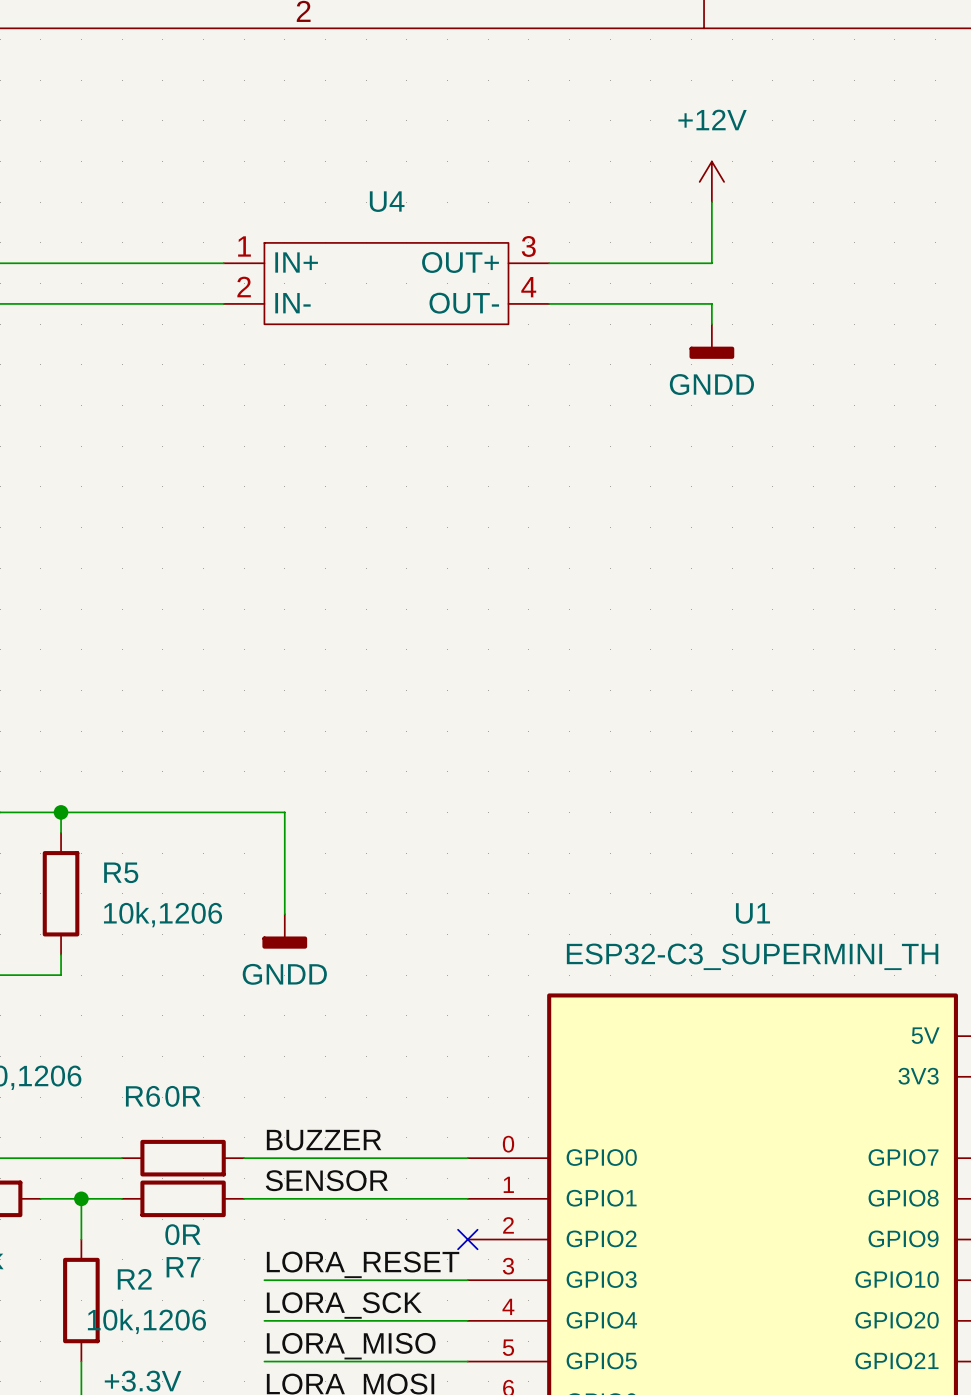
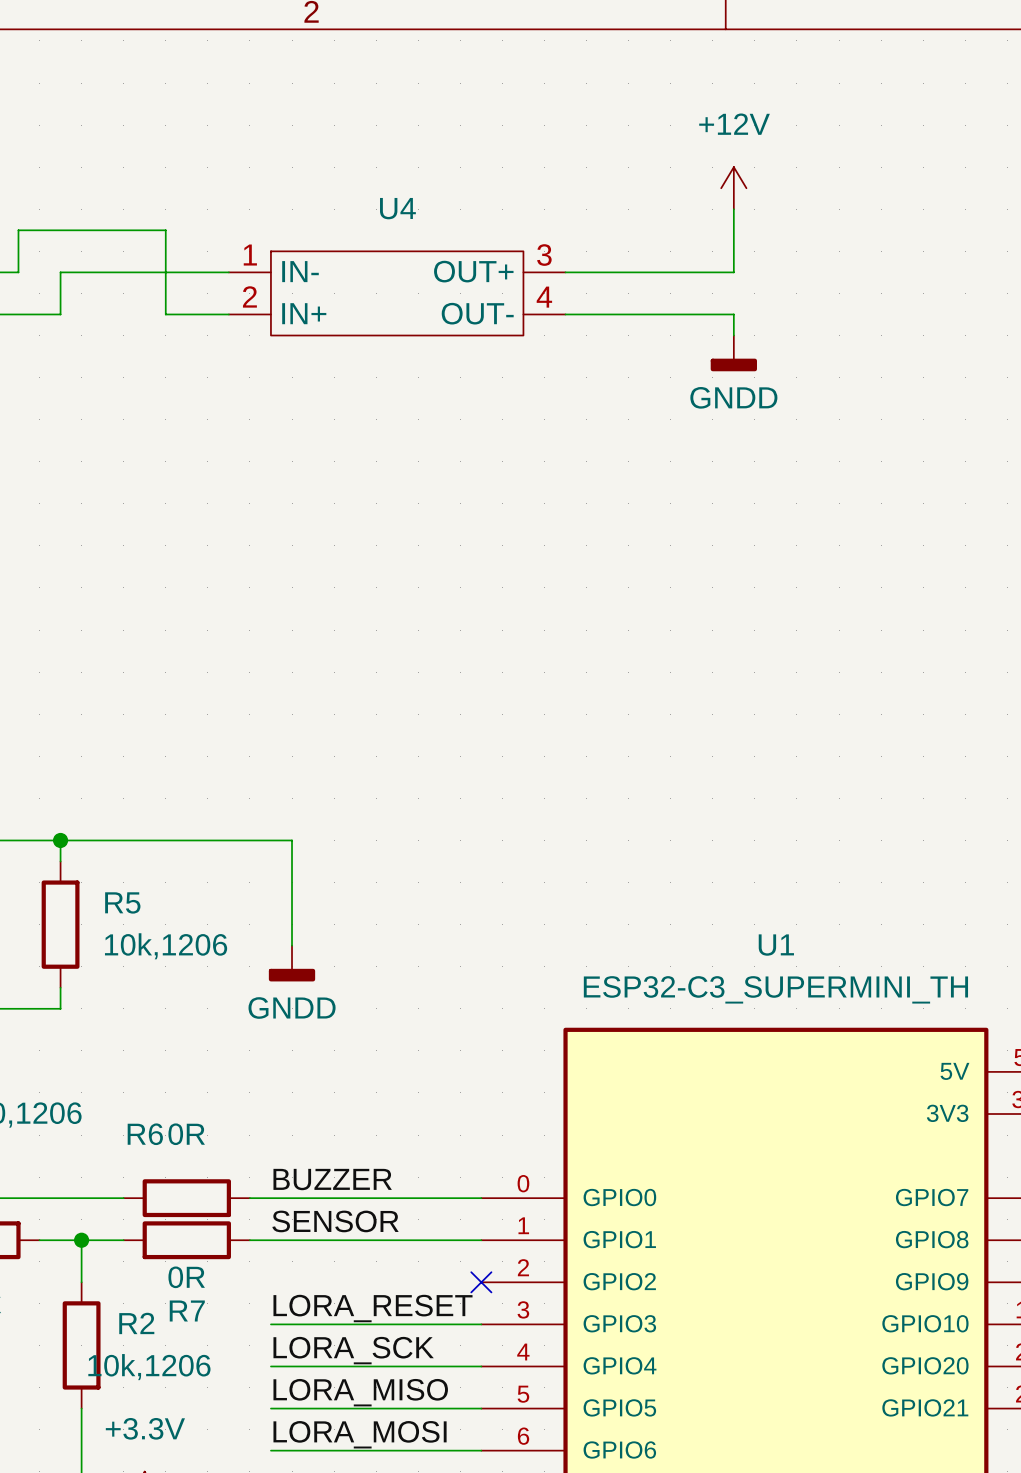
U4 pin name: IN+ (296, 262) -> IN- (300, 271)
wire: (20, 263) (61, 263) -> (60, 314) (60, 272)
wire: (61, 303) (162, 303) -> (18, 272) (18, 230) (165, 230) (165, 314)
U4 pin name: IN- (292, 303) -> IN+ (304, 313)

